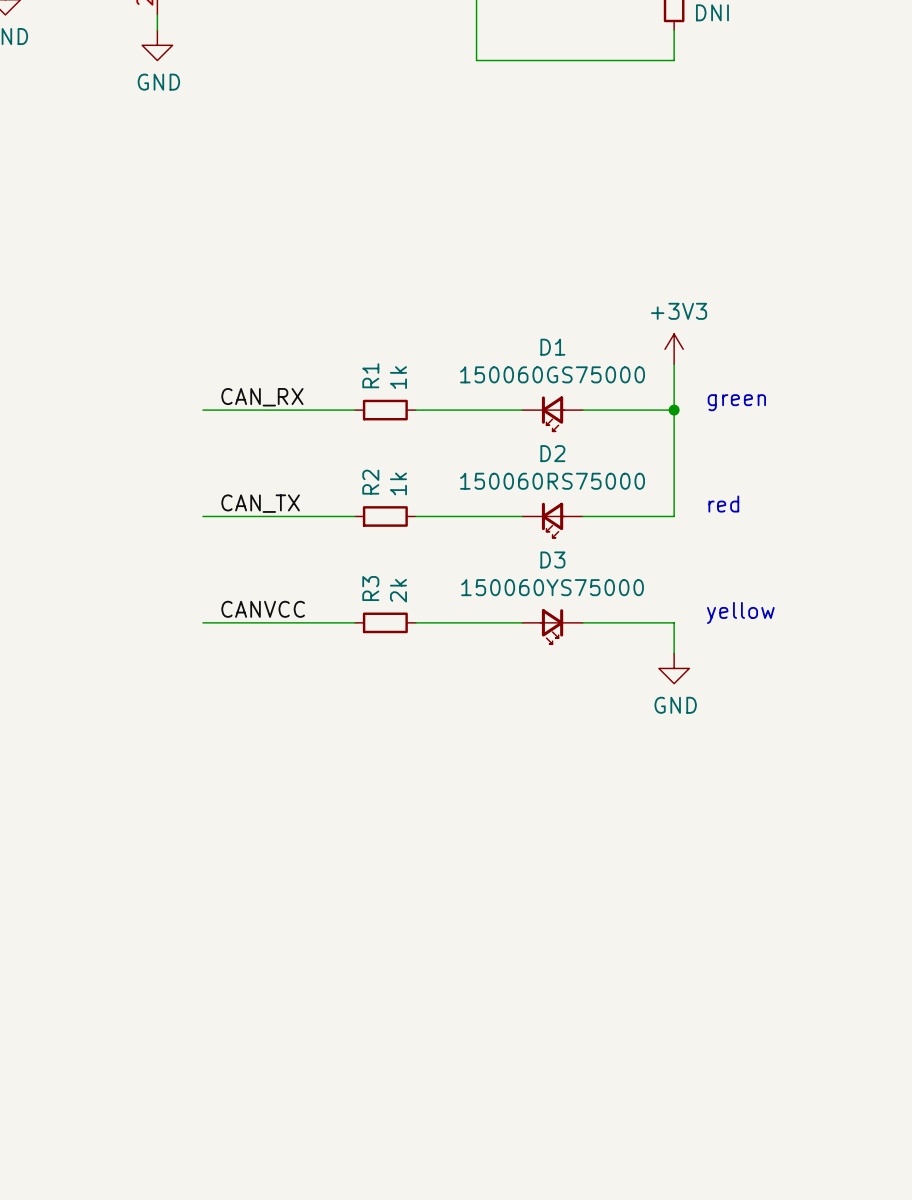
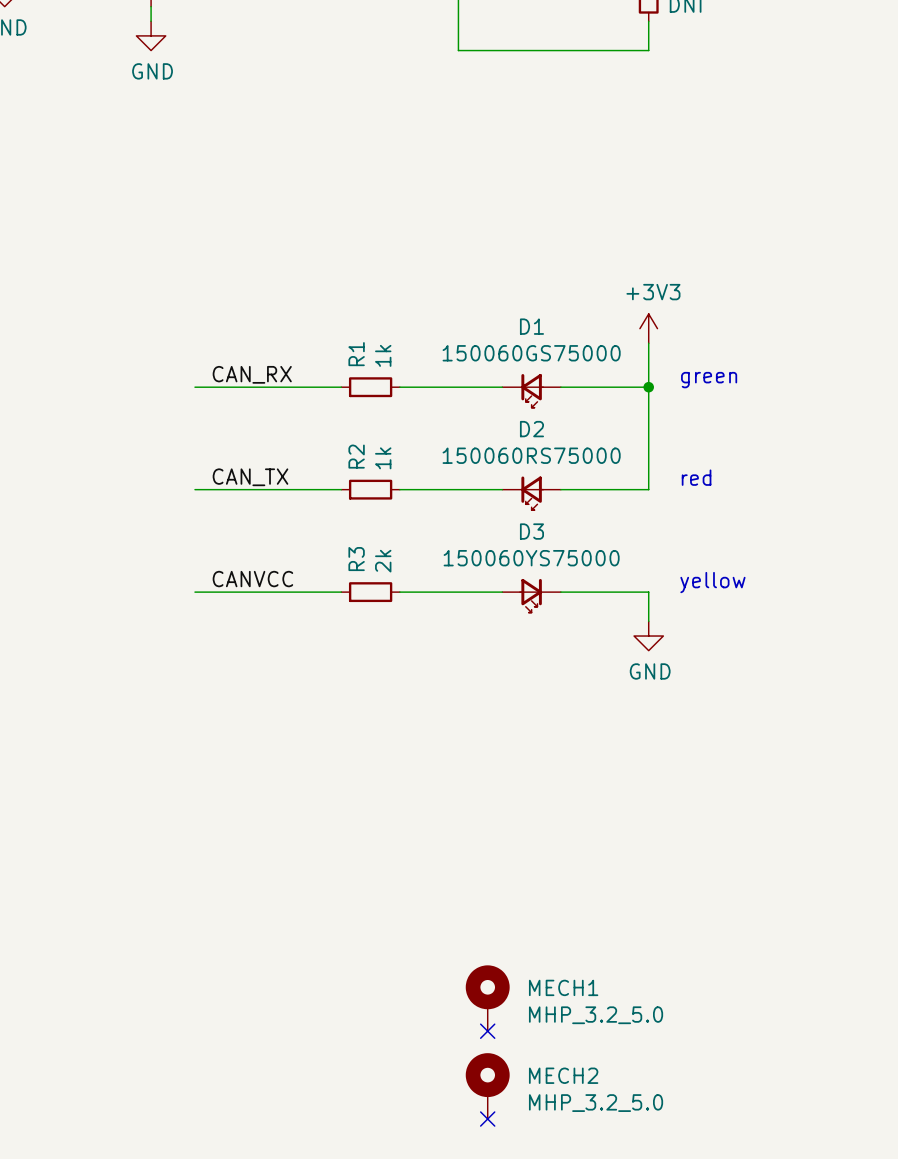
MECH1: none -> MHP_3.2_5.0 (487, 998)
no-connect mark: none -> (487, 1031)
MECH2: none -> MHP_3.2_5.0 (487, 1086)
no-connect mark: none -> (487, 1119)

